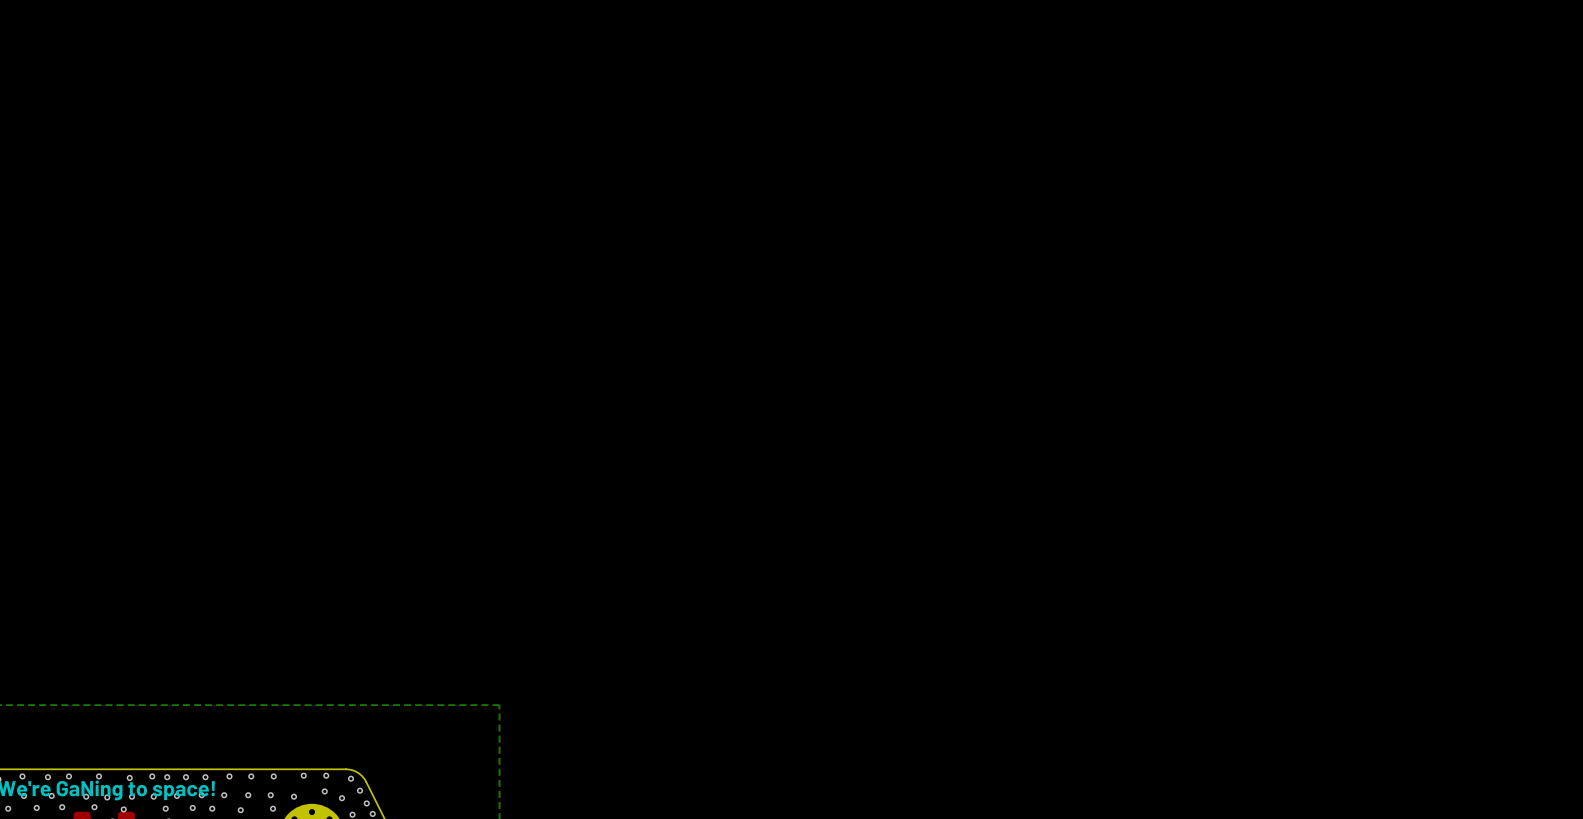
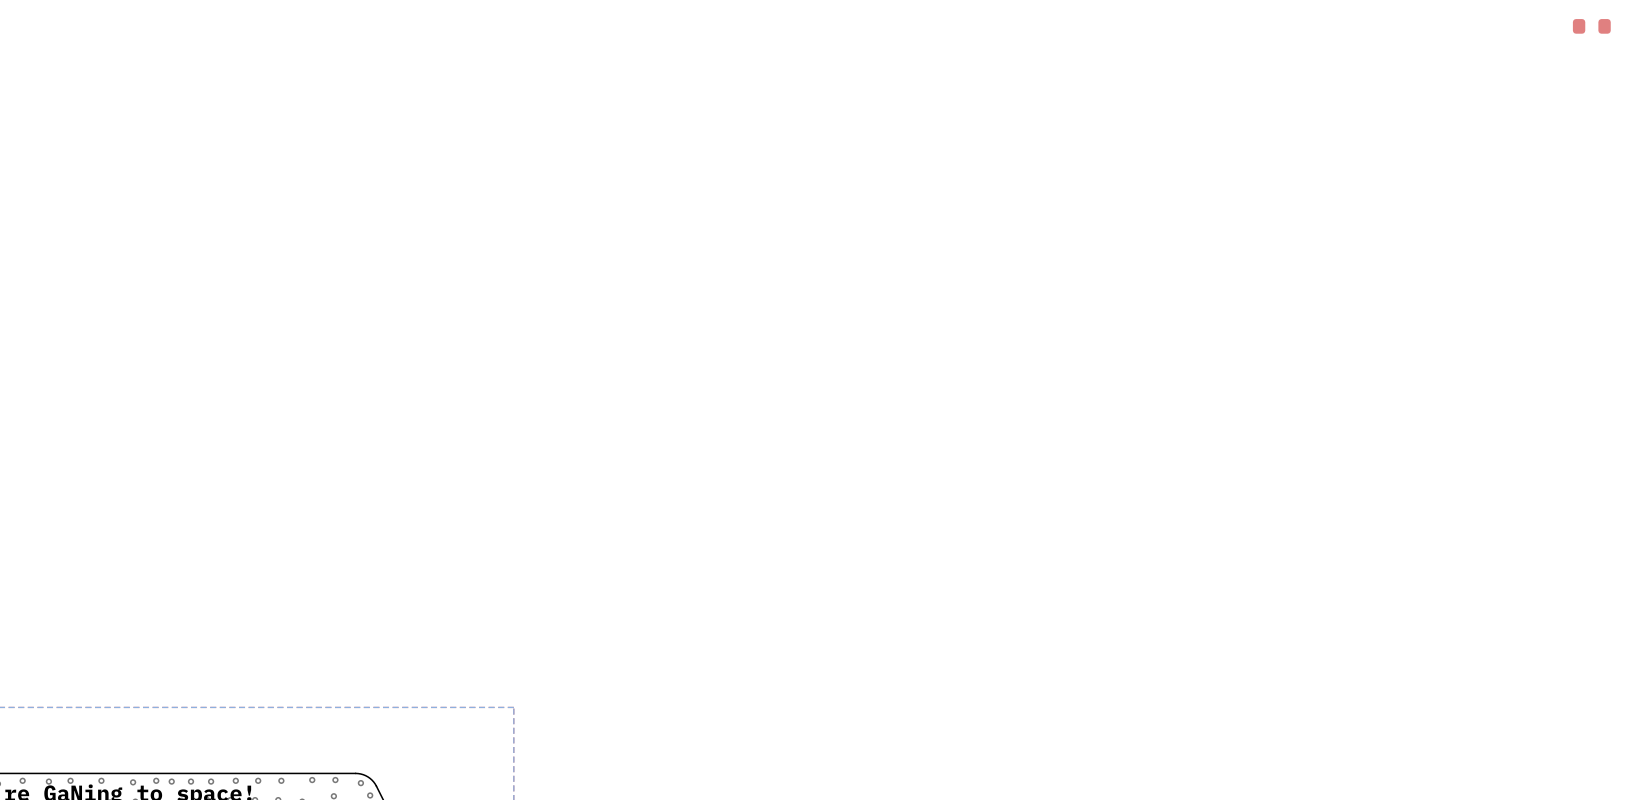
part: none -> (1591, 26)

